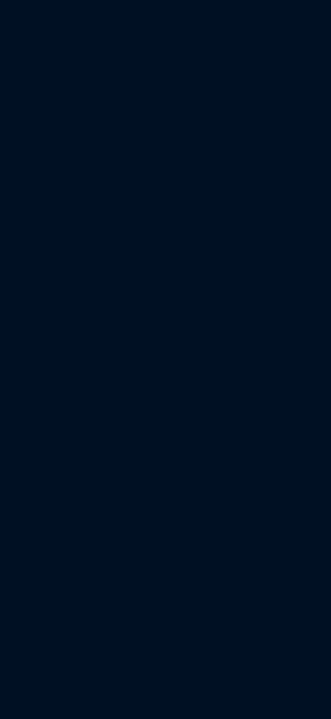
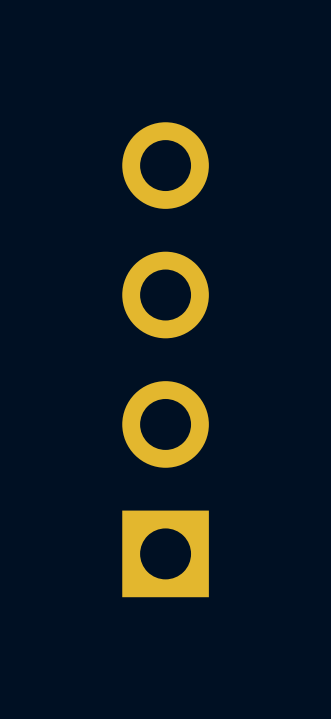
part: none -> (165, 359)

